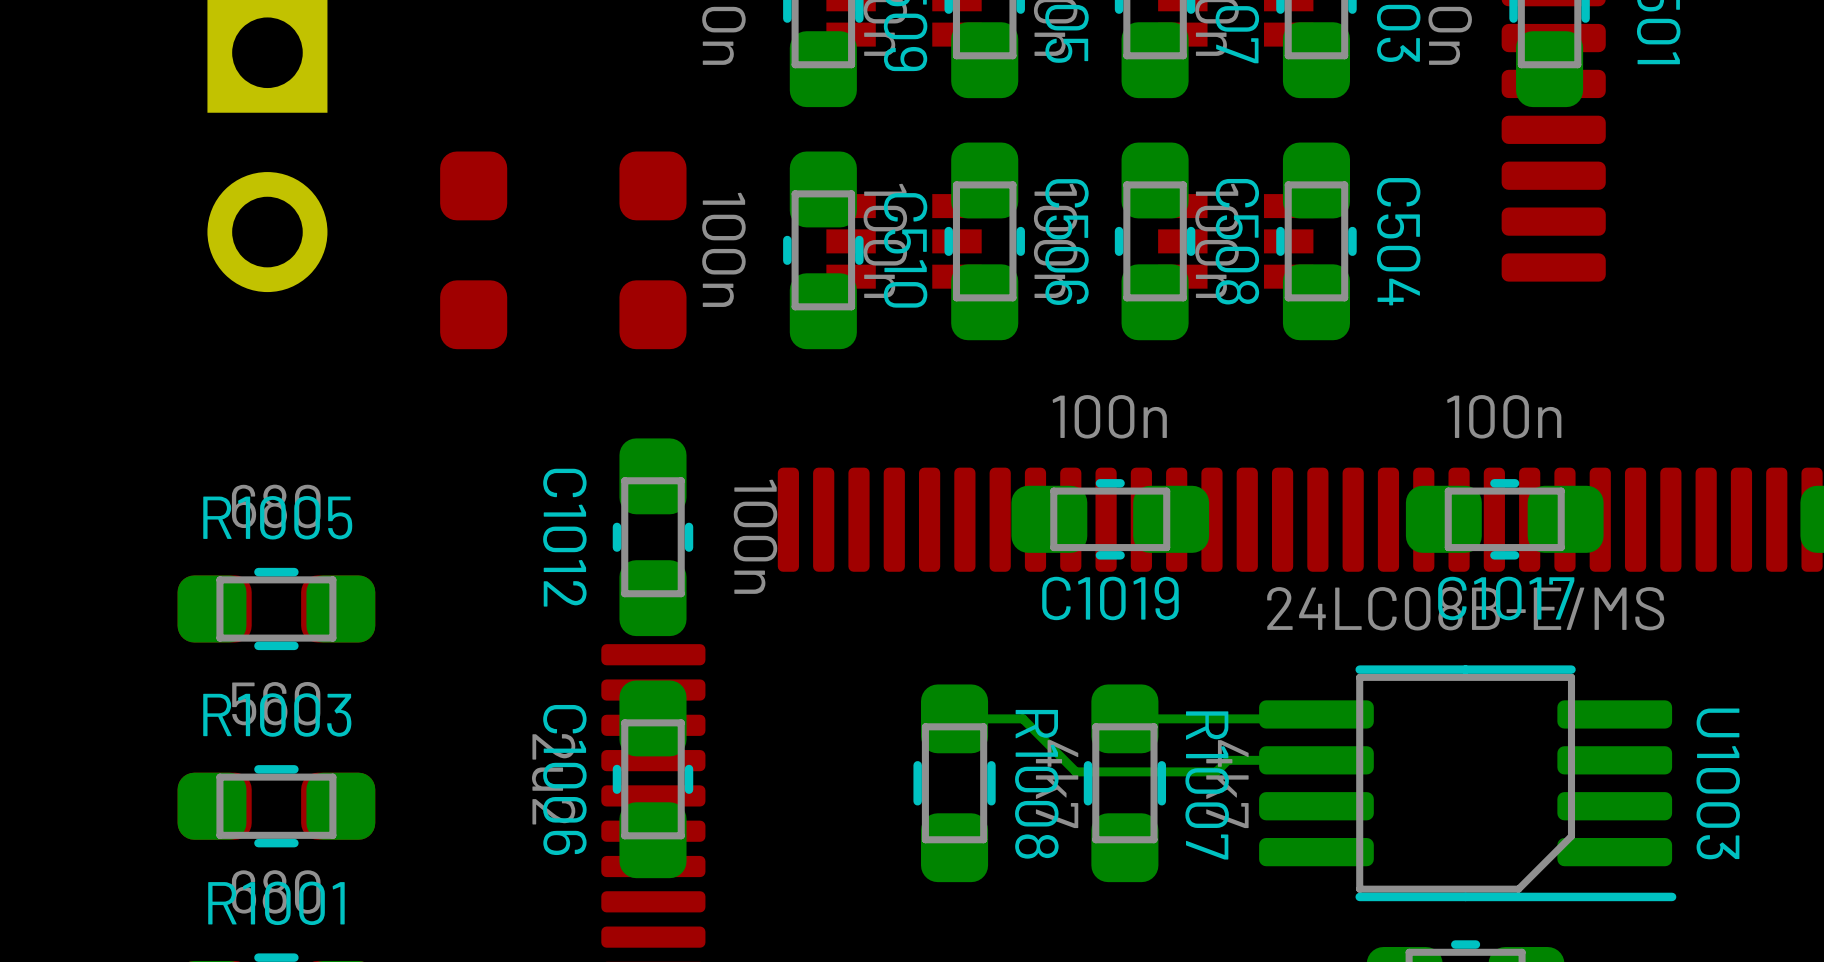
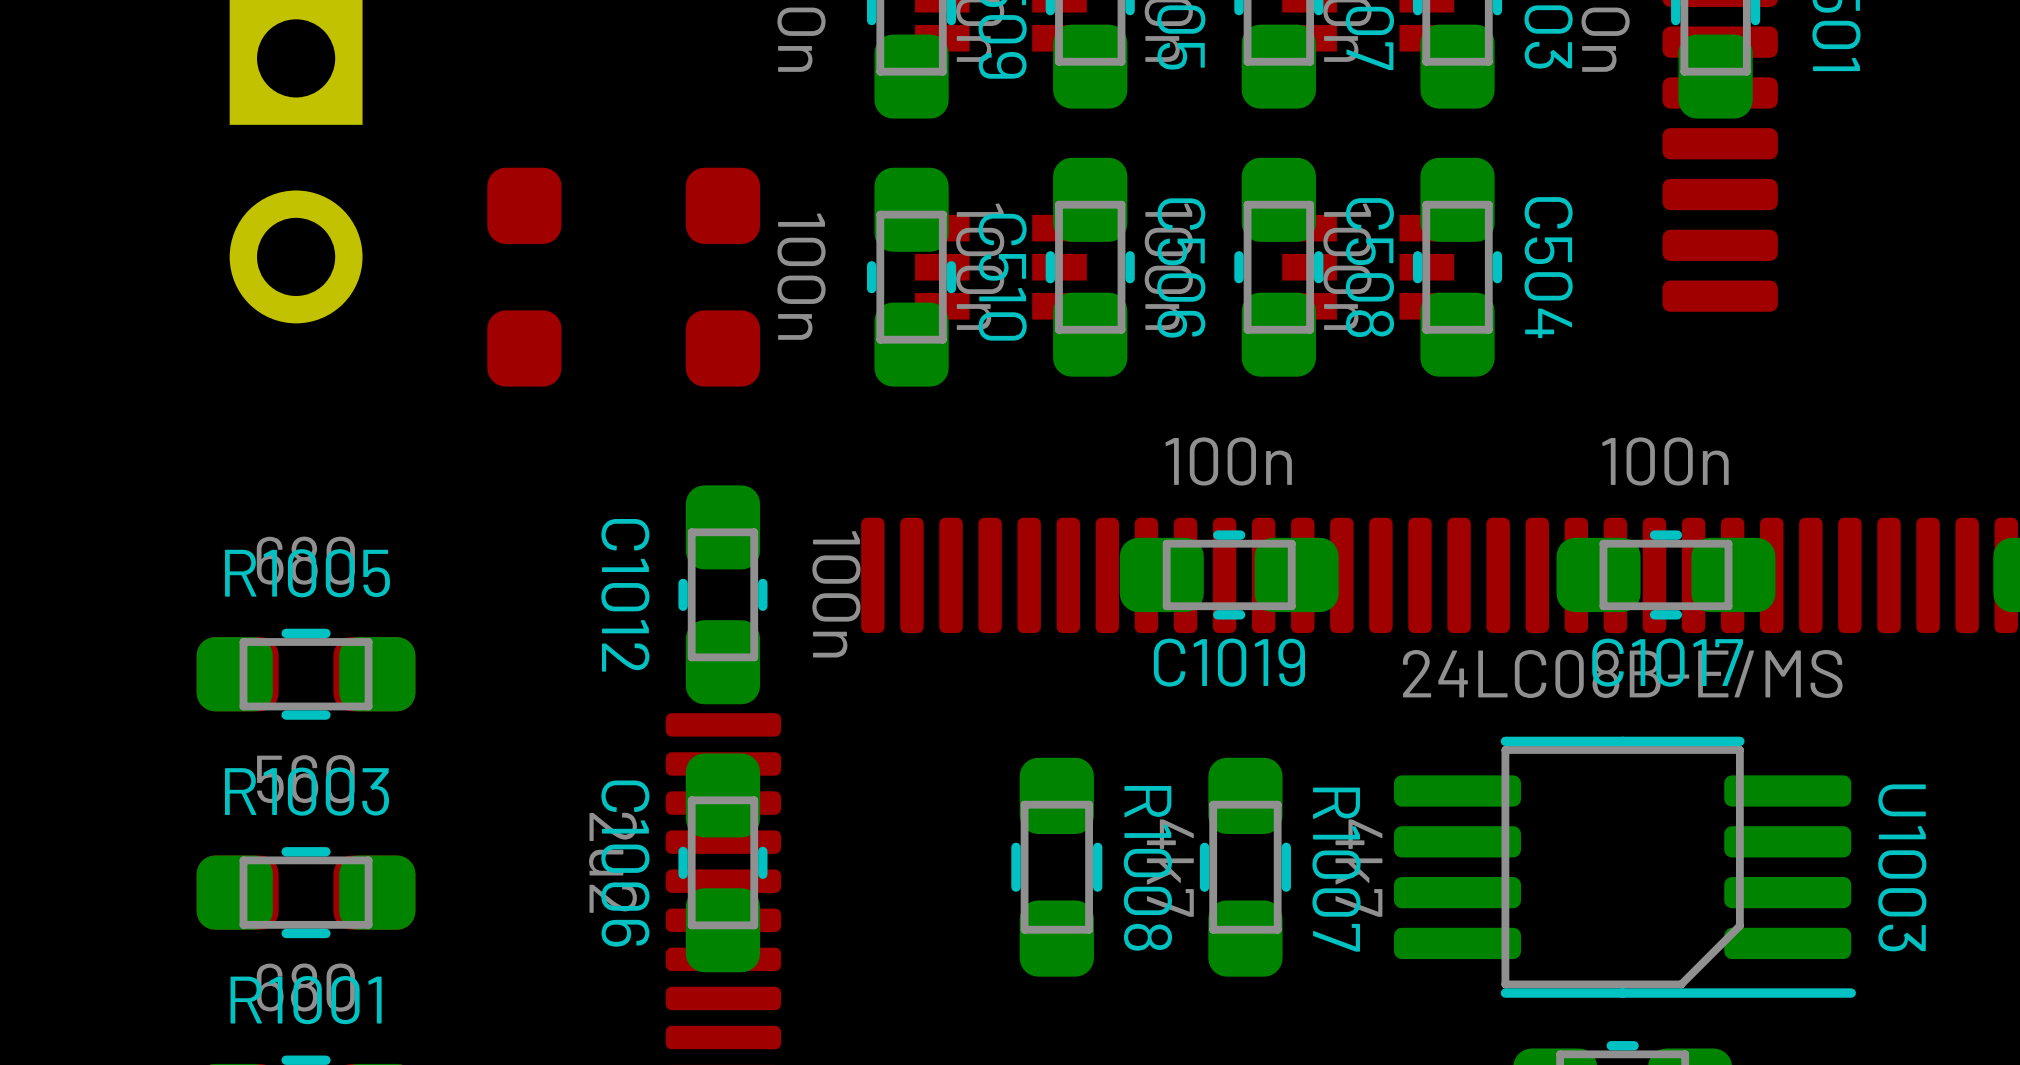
bottom track: (1316, 714) (1312, 718) (1124, 718) -> none
bottom track: (954, 718) (1022, 718) (1075, 771) (1216, 771) (1227, 760) (1316, 760) -> none

